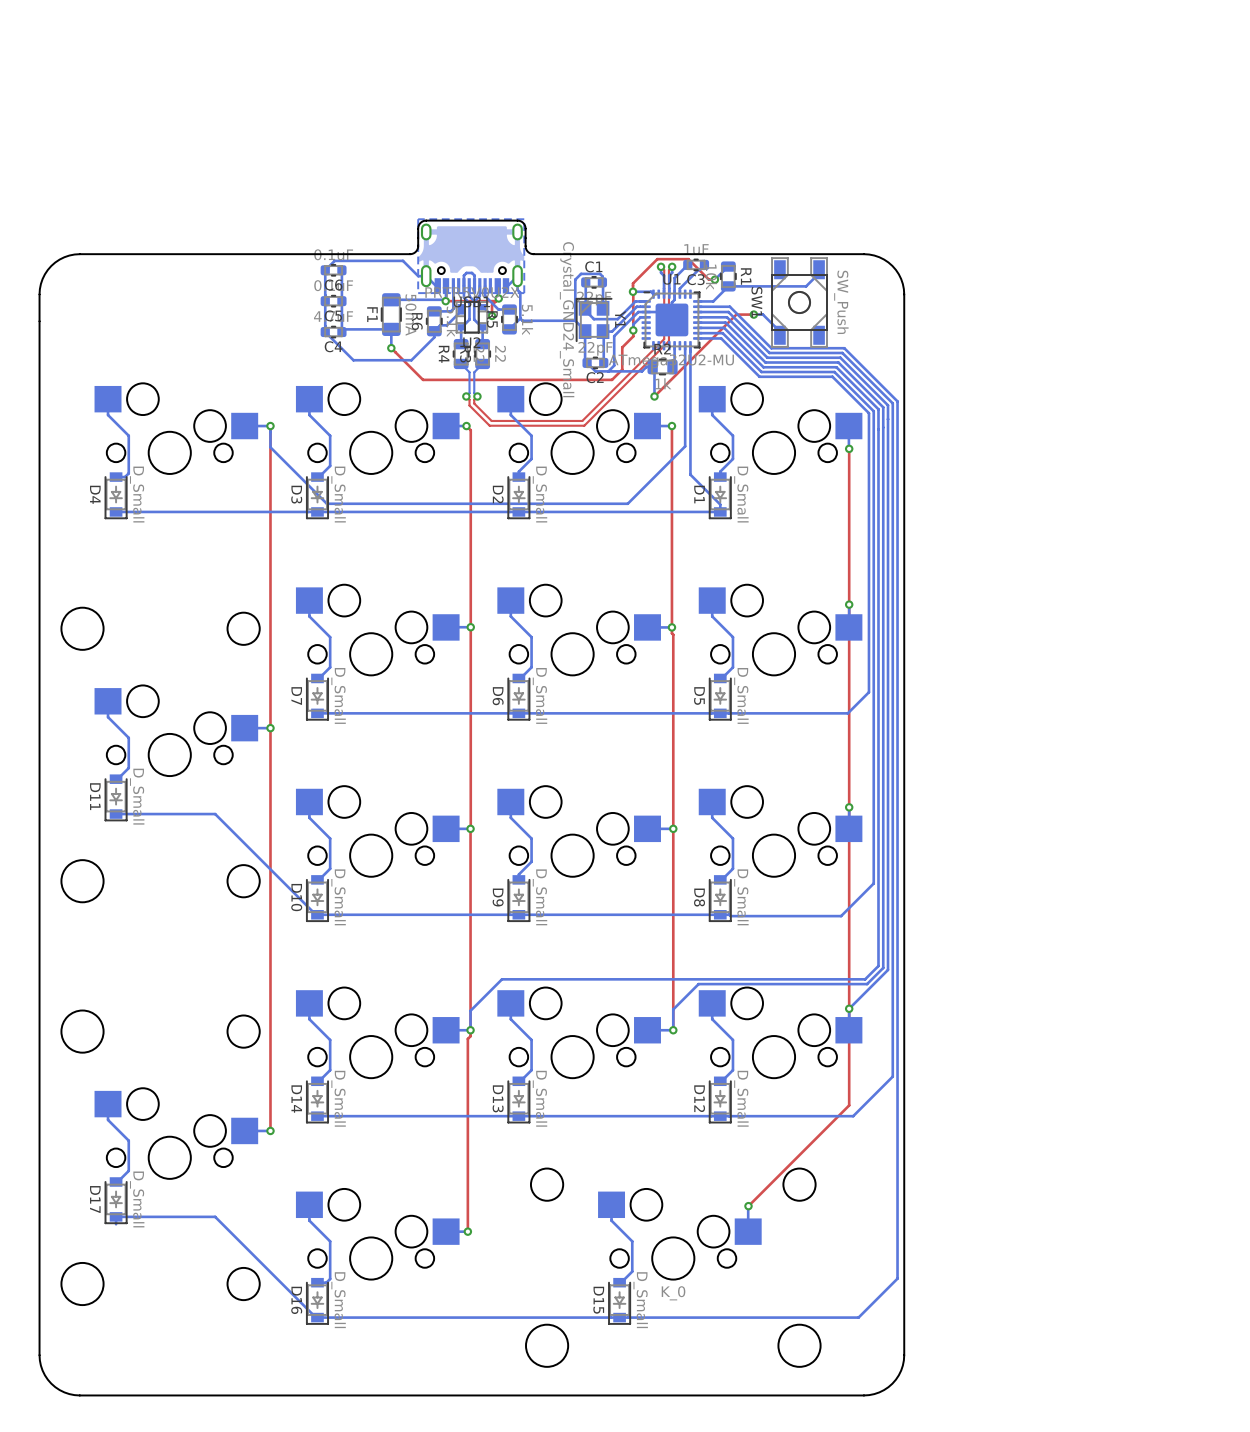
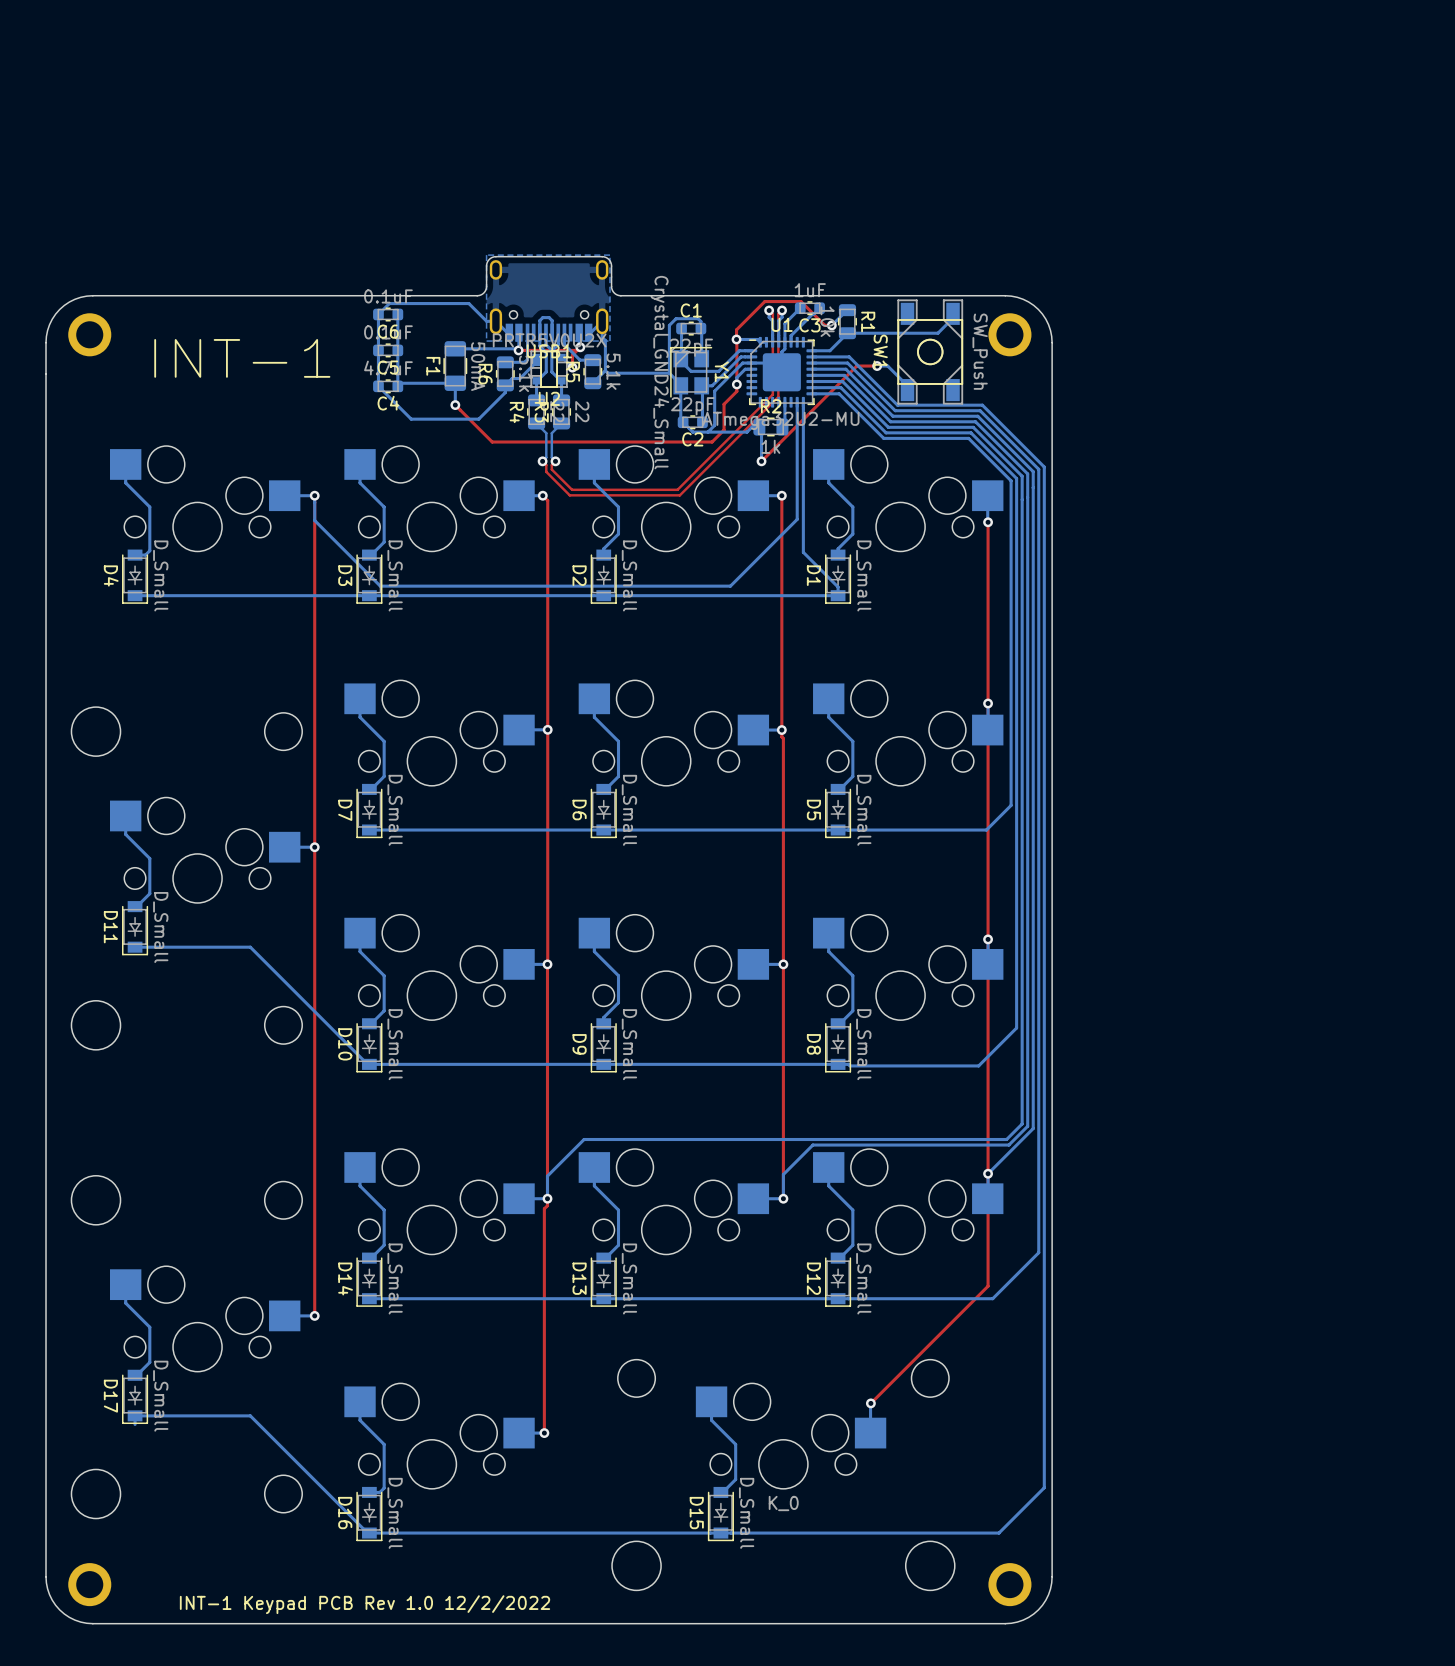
part: none -> (89, 334)
part: none -> (1009, 334)
text: none -> INT-1 (242, 358)
part: none -> (89, 1584)
part: none -> (1009, 1584)
text: none -> INT-1 Keypad PCB Rev 1.0 12/2/2022 (365, 1604)

